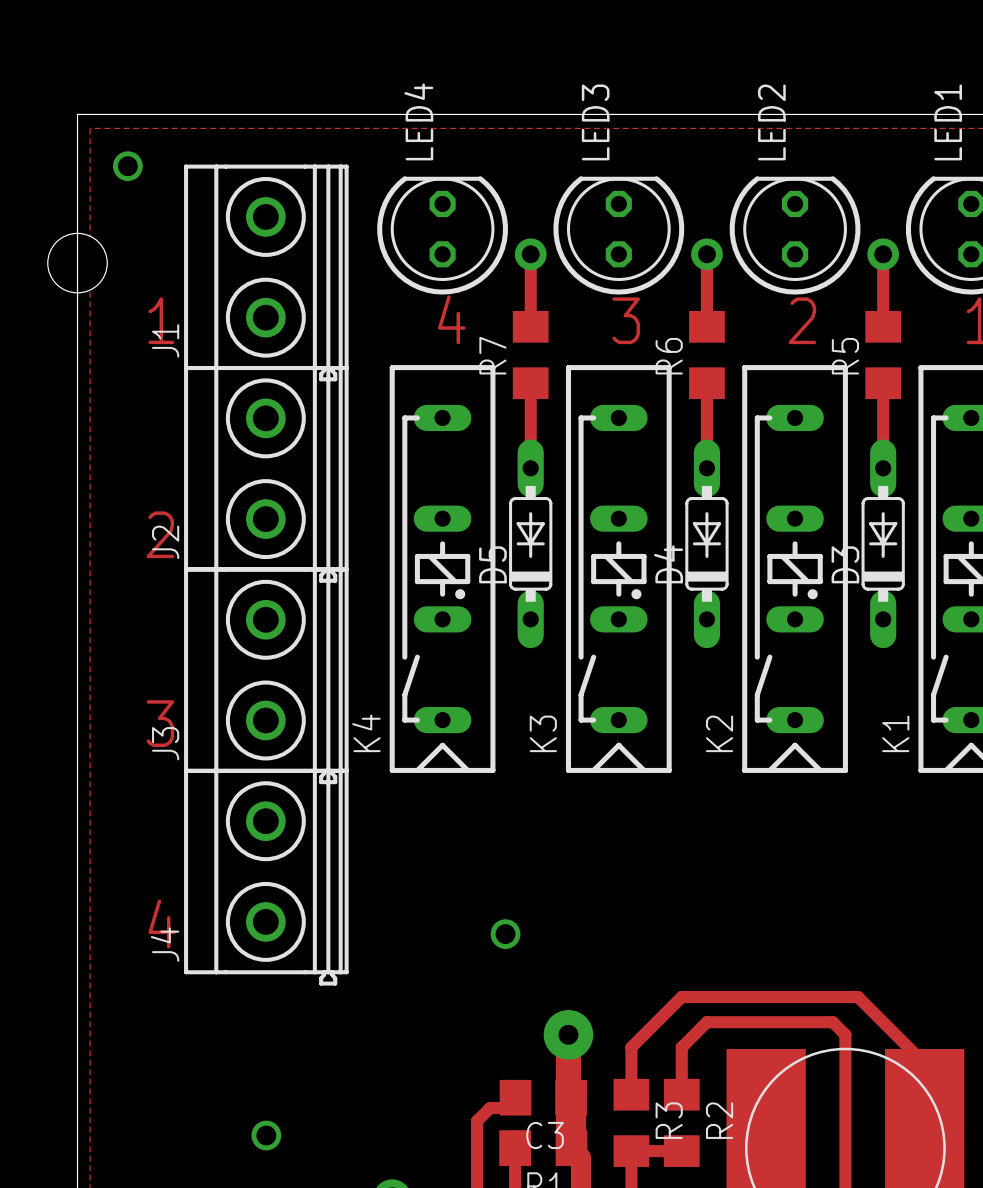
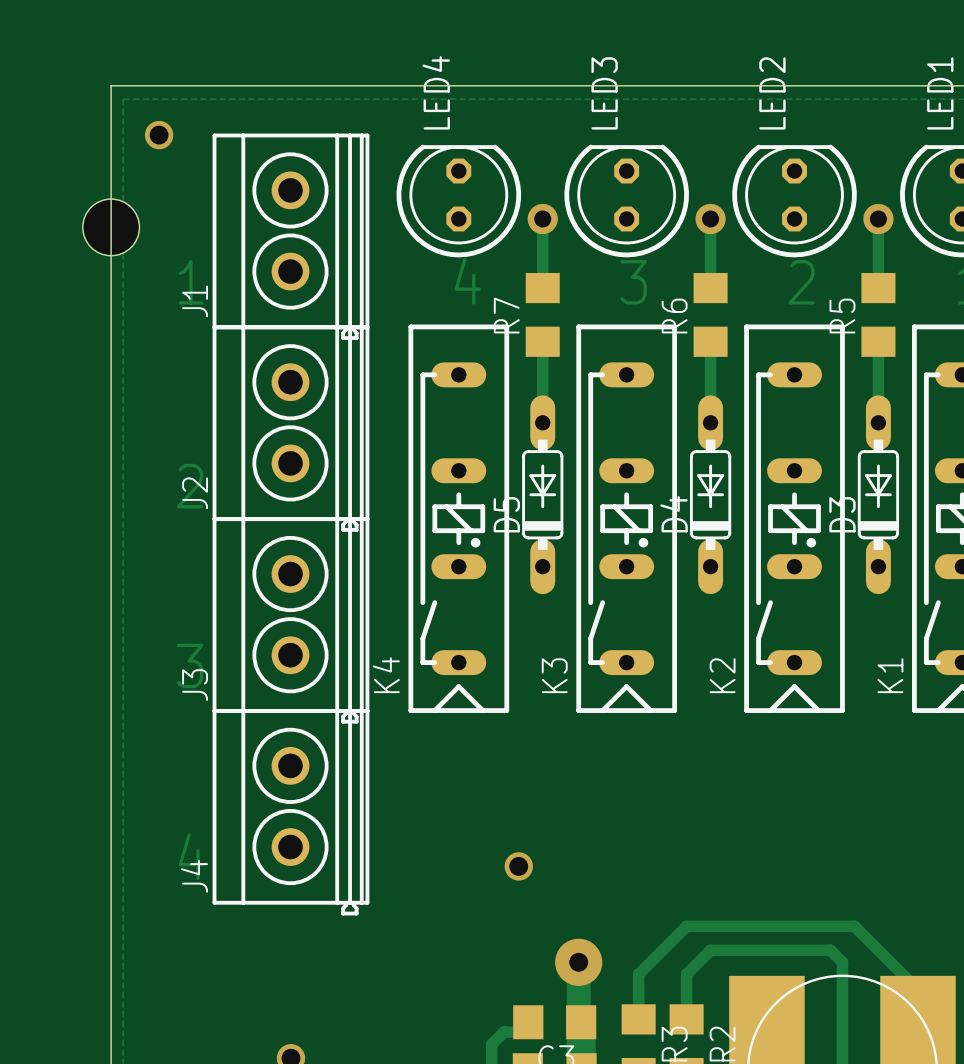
J1 footprint: [184, 164, 349, 382] -> [212, 133, 370, 340]
J2 footprint: [184, 366, 349, 583] -> [212, 325, 370, 532]
J3 footprint: [184, 567, 349, 785] -> [212, 517, 370, 724]
J4 footprint: [184, 768, 349, 986] -> [212, 709, 370, 916]

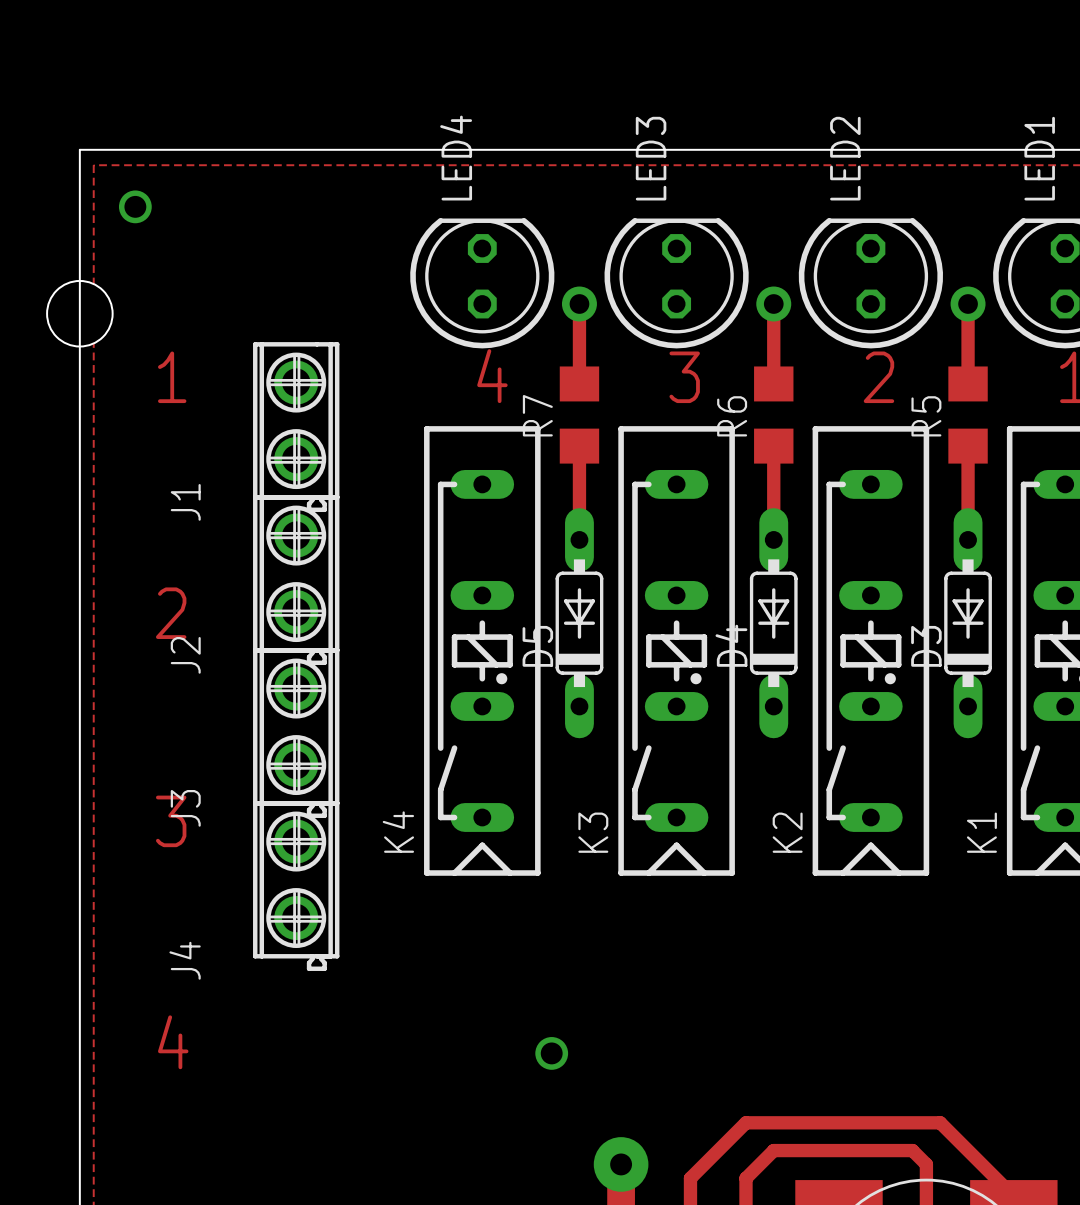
J1 footprint: [212, 133, 370, 340] -> [253, 342, 340, 513]
J2 footprint: [212, 325, 370, 532] -> [253, 495, 340, 666]
J3 footprint: [212, 517, 370, 724] -> [253, 648, 340, 818]
J4 footprint: [212, 709, 370, 916] -> [253, 801, 340, 971]

